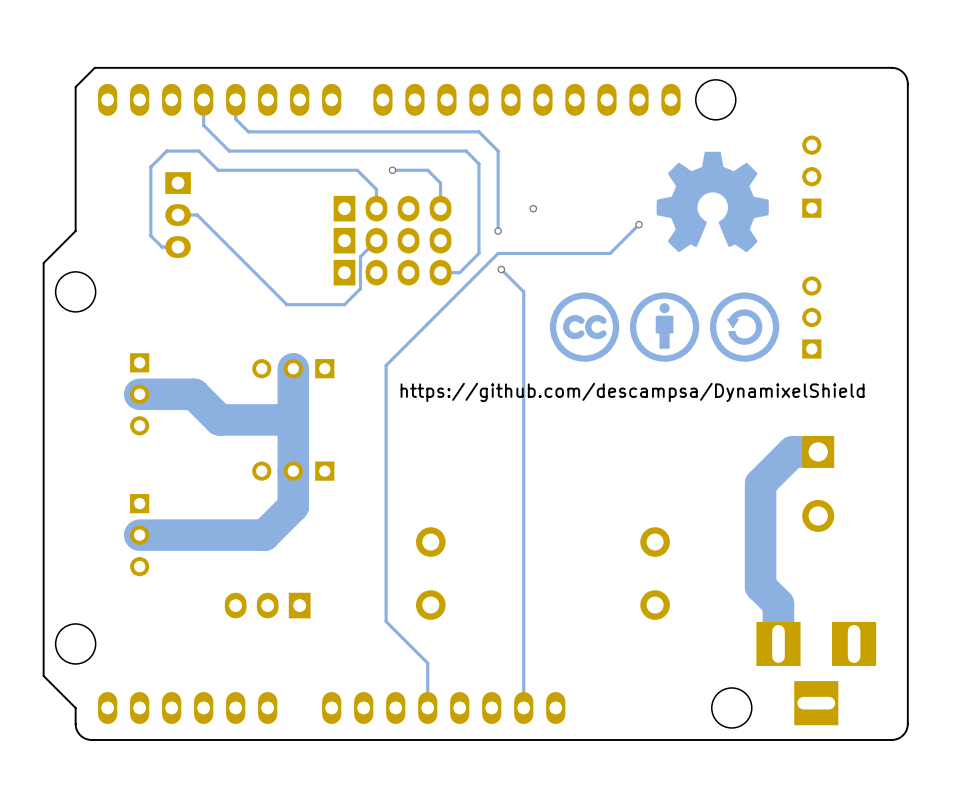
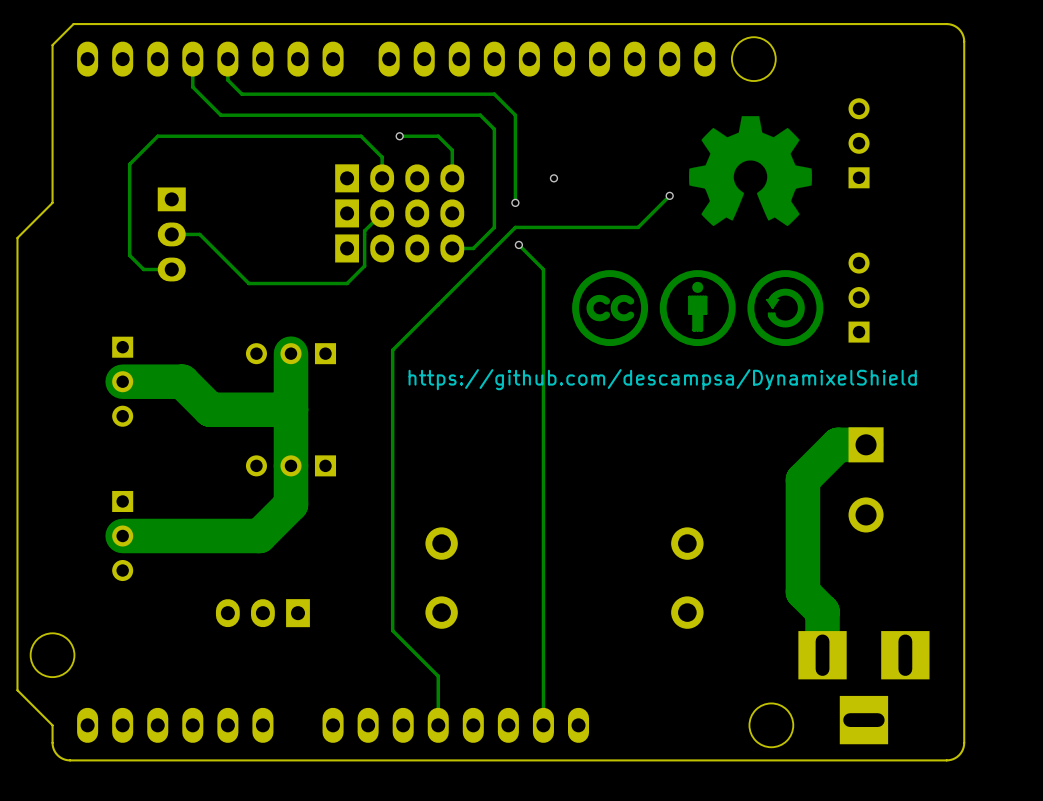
part footprint: [42, 66, 909, 741] -> [16, 23, 966, 762]
track: (218, 170) (198, 151) (166, 151) (150, 167) (150, 235) (162, 247) (178, 247) -> (208, 136) (157, 136) (129, 164) (129, 255) (143, 269) (171, 269)
track: (178, 215) (197, 215) (286, 304) -> (171, 234) (199, 234) (248, 283) (283, 283)
part position: (178, 215) -> (171, 234)

